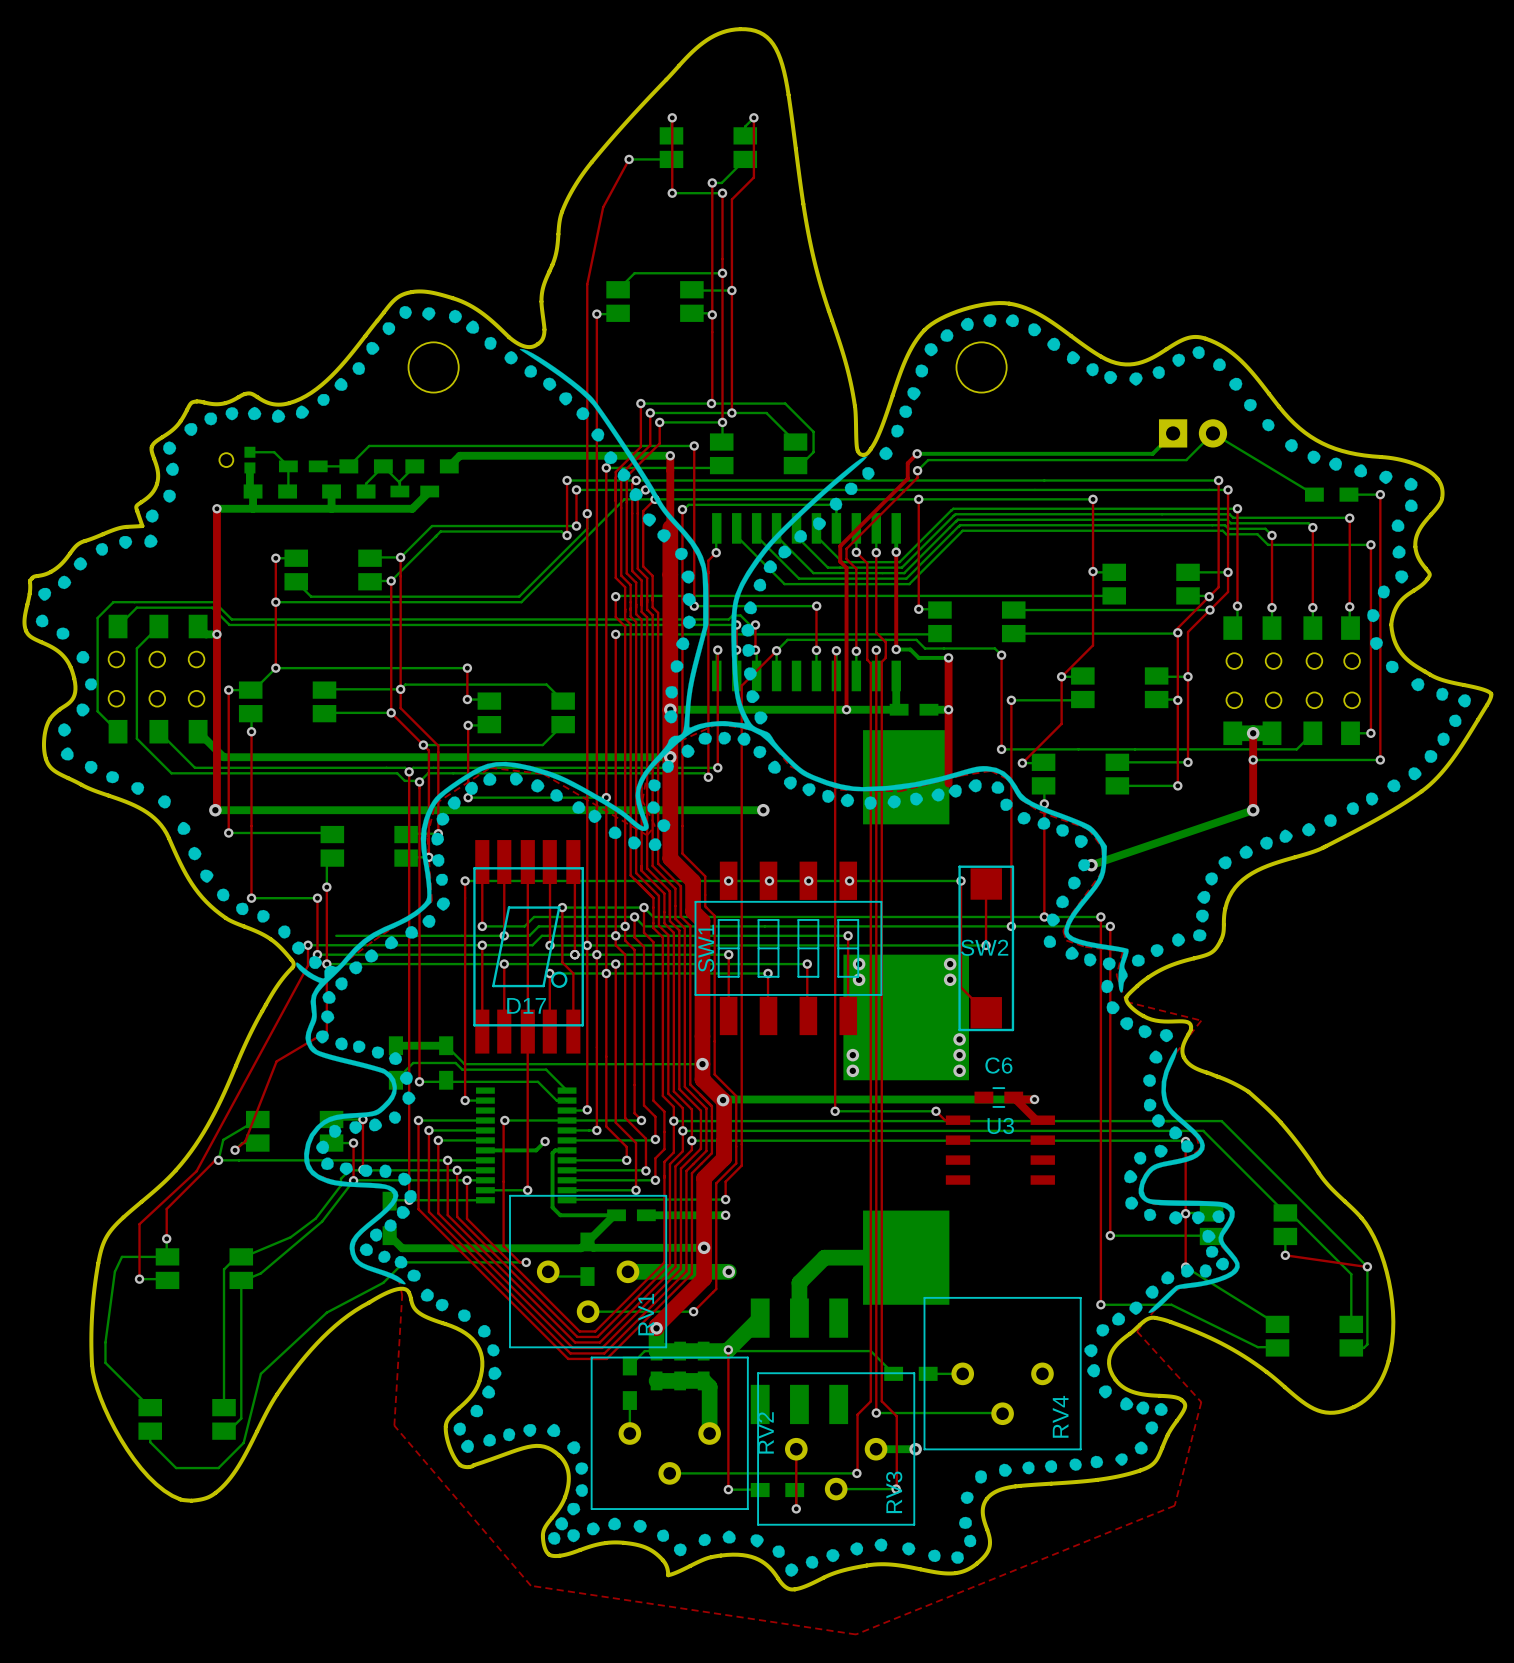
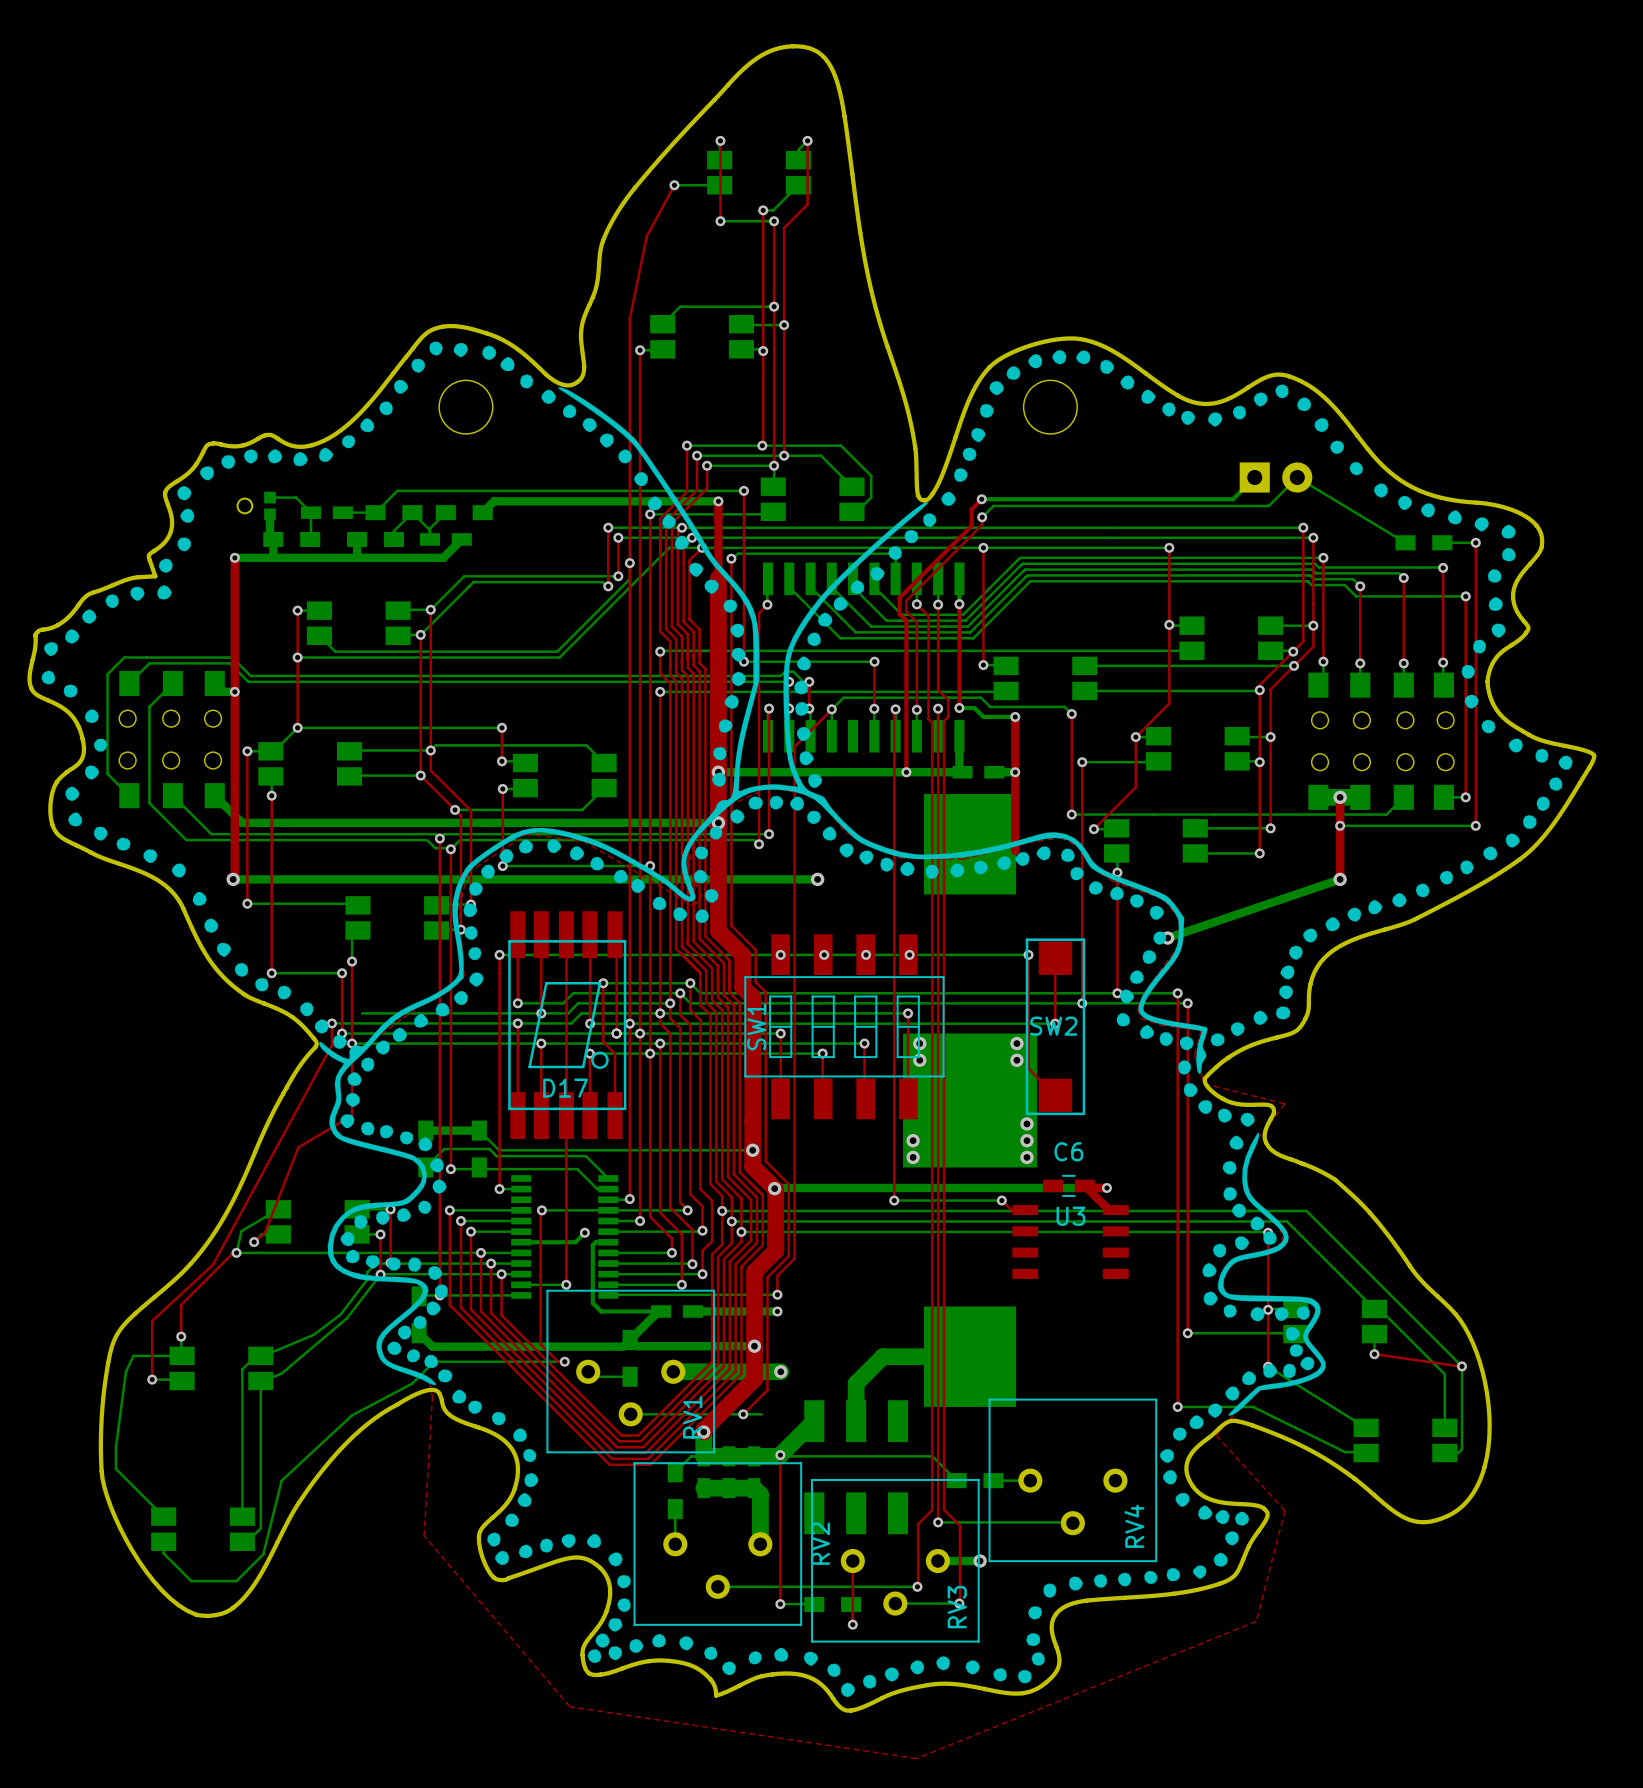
bottom track: none -> (743, 1414) (761, 1414)

